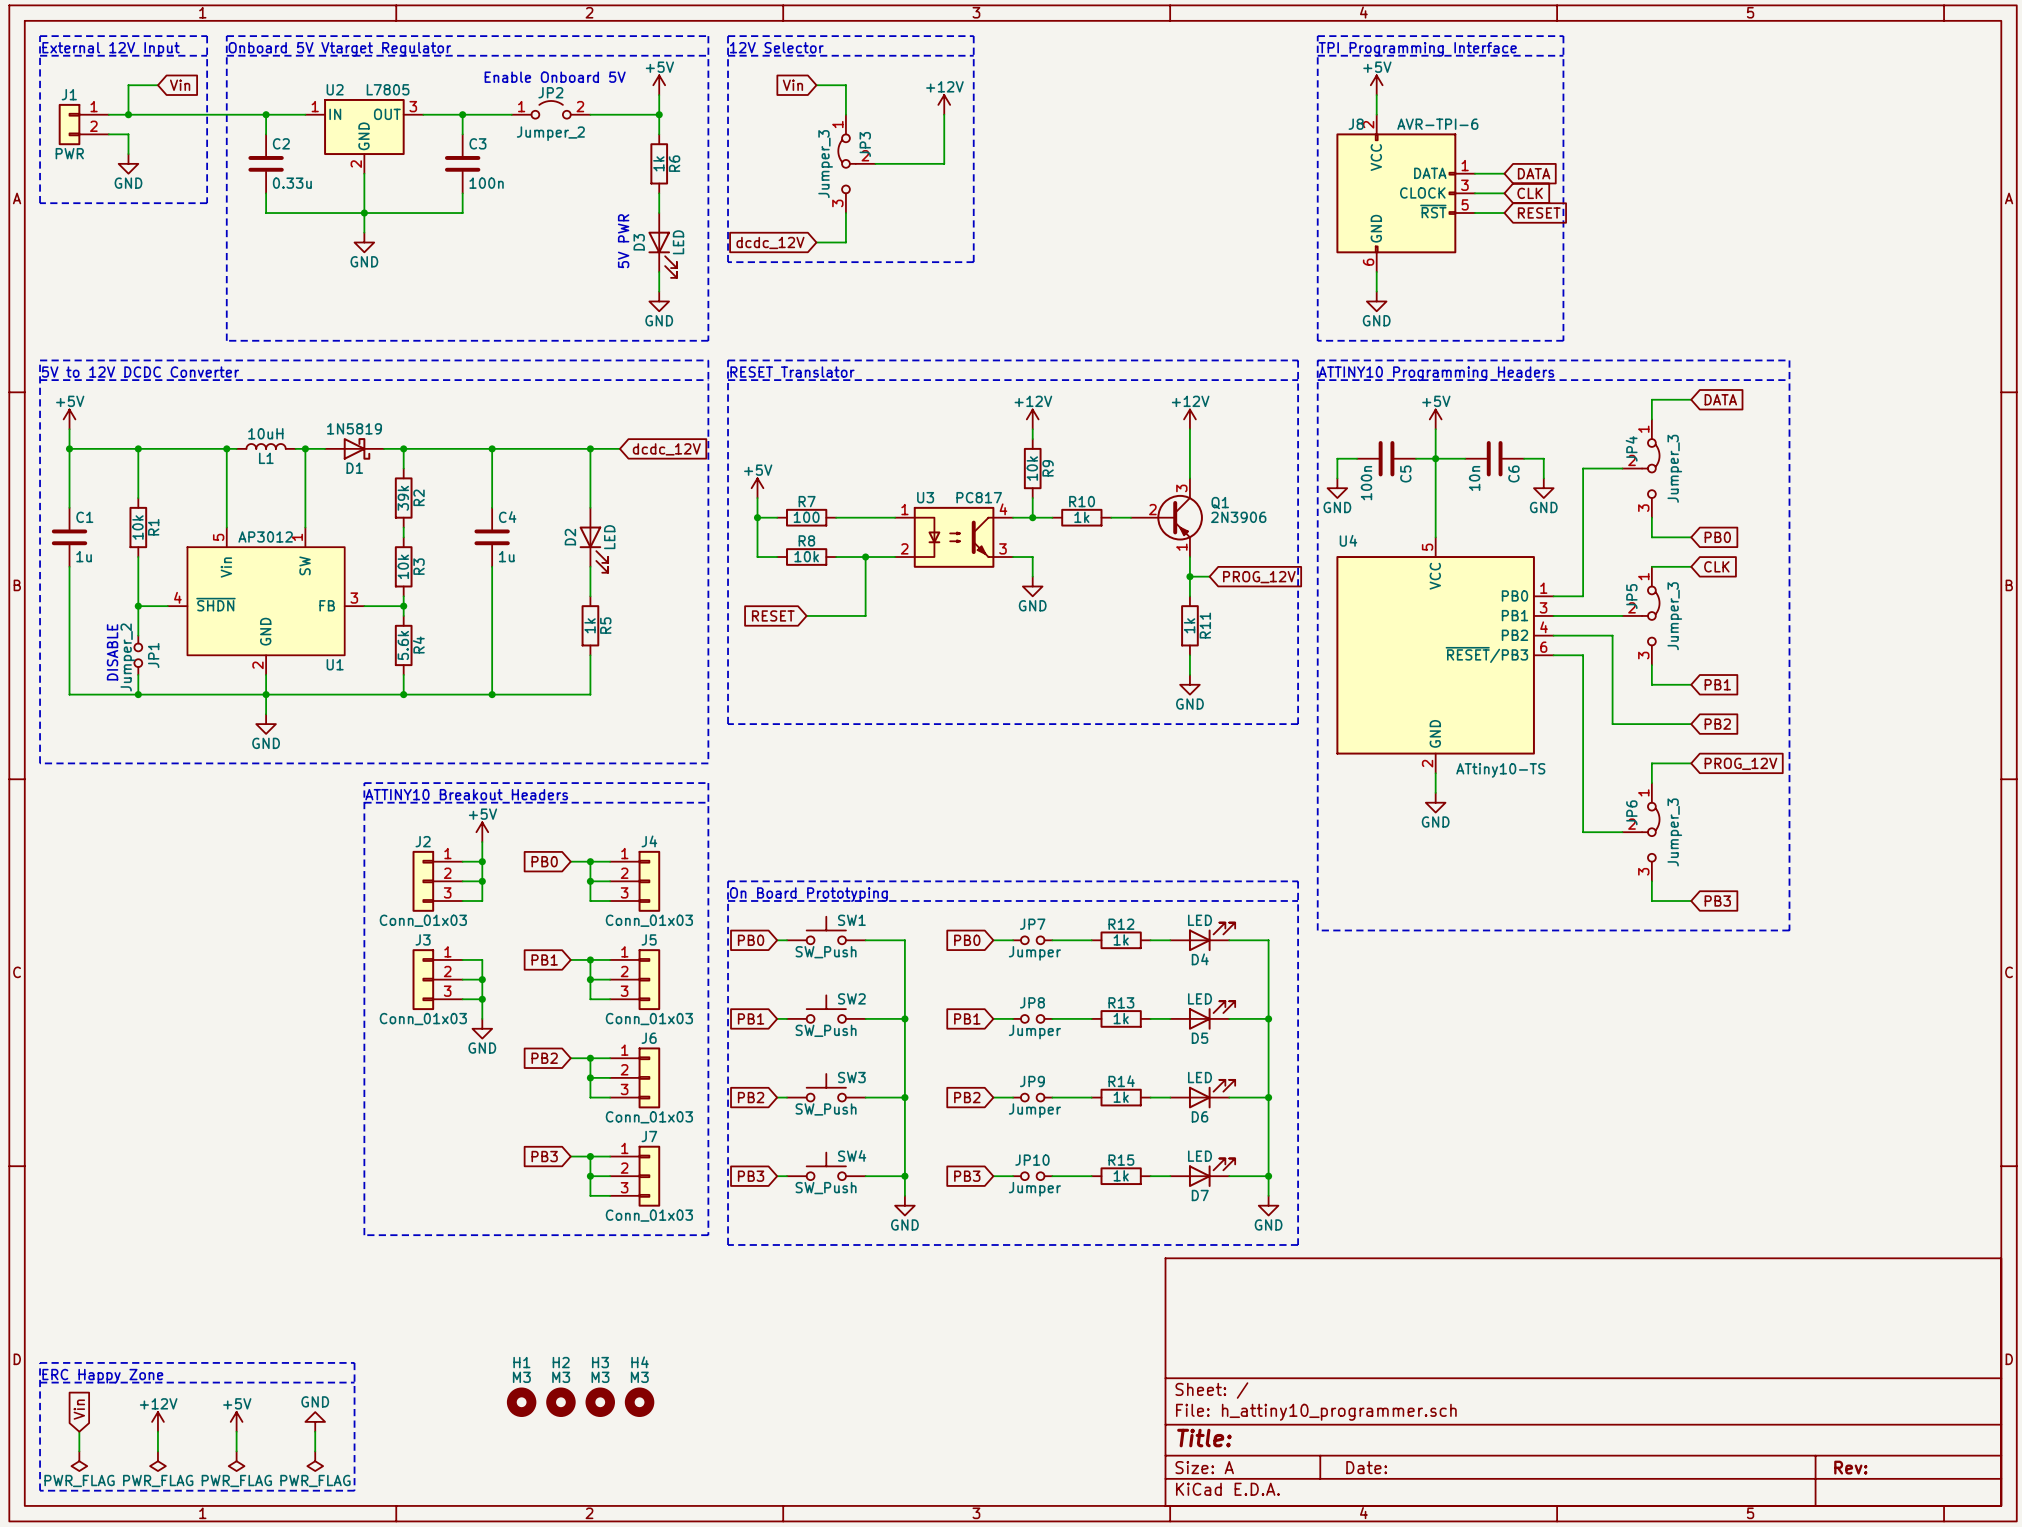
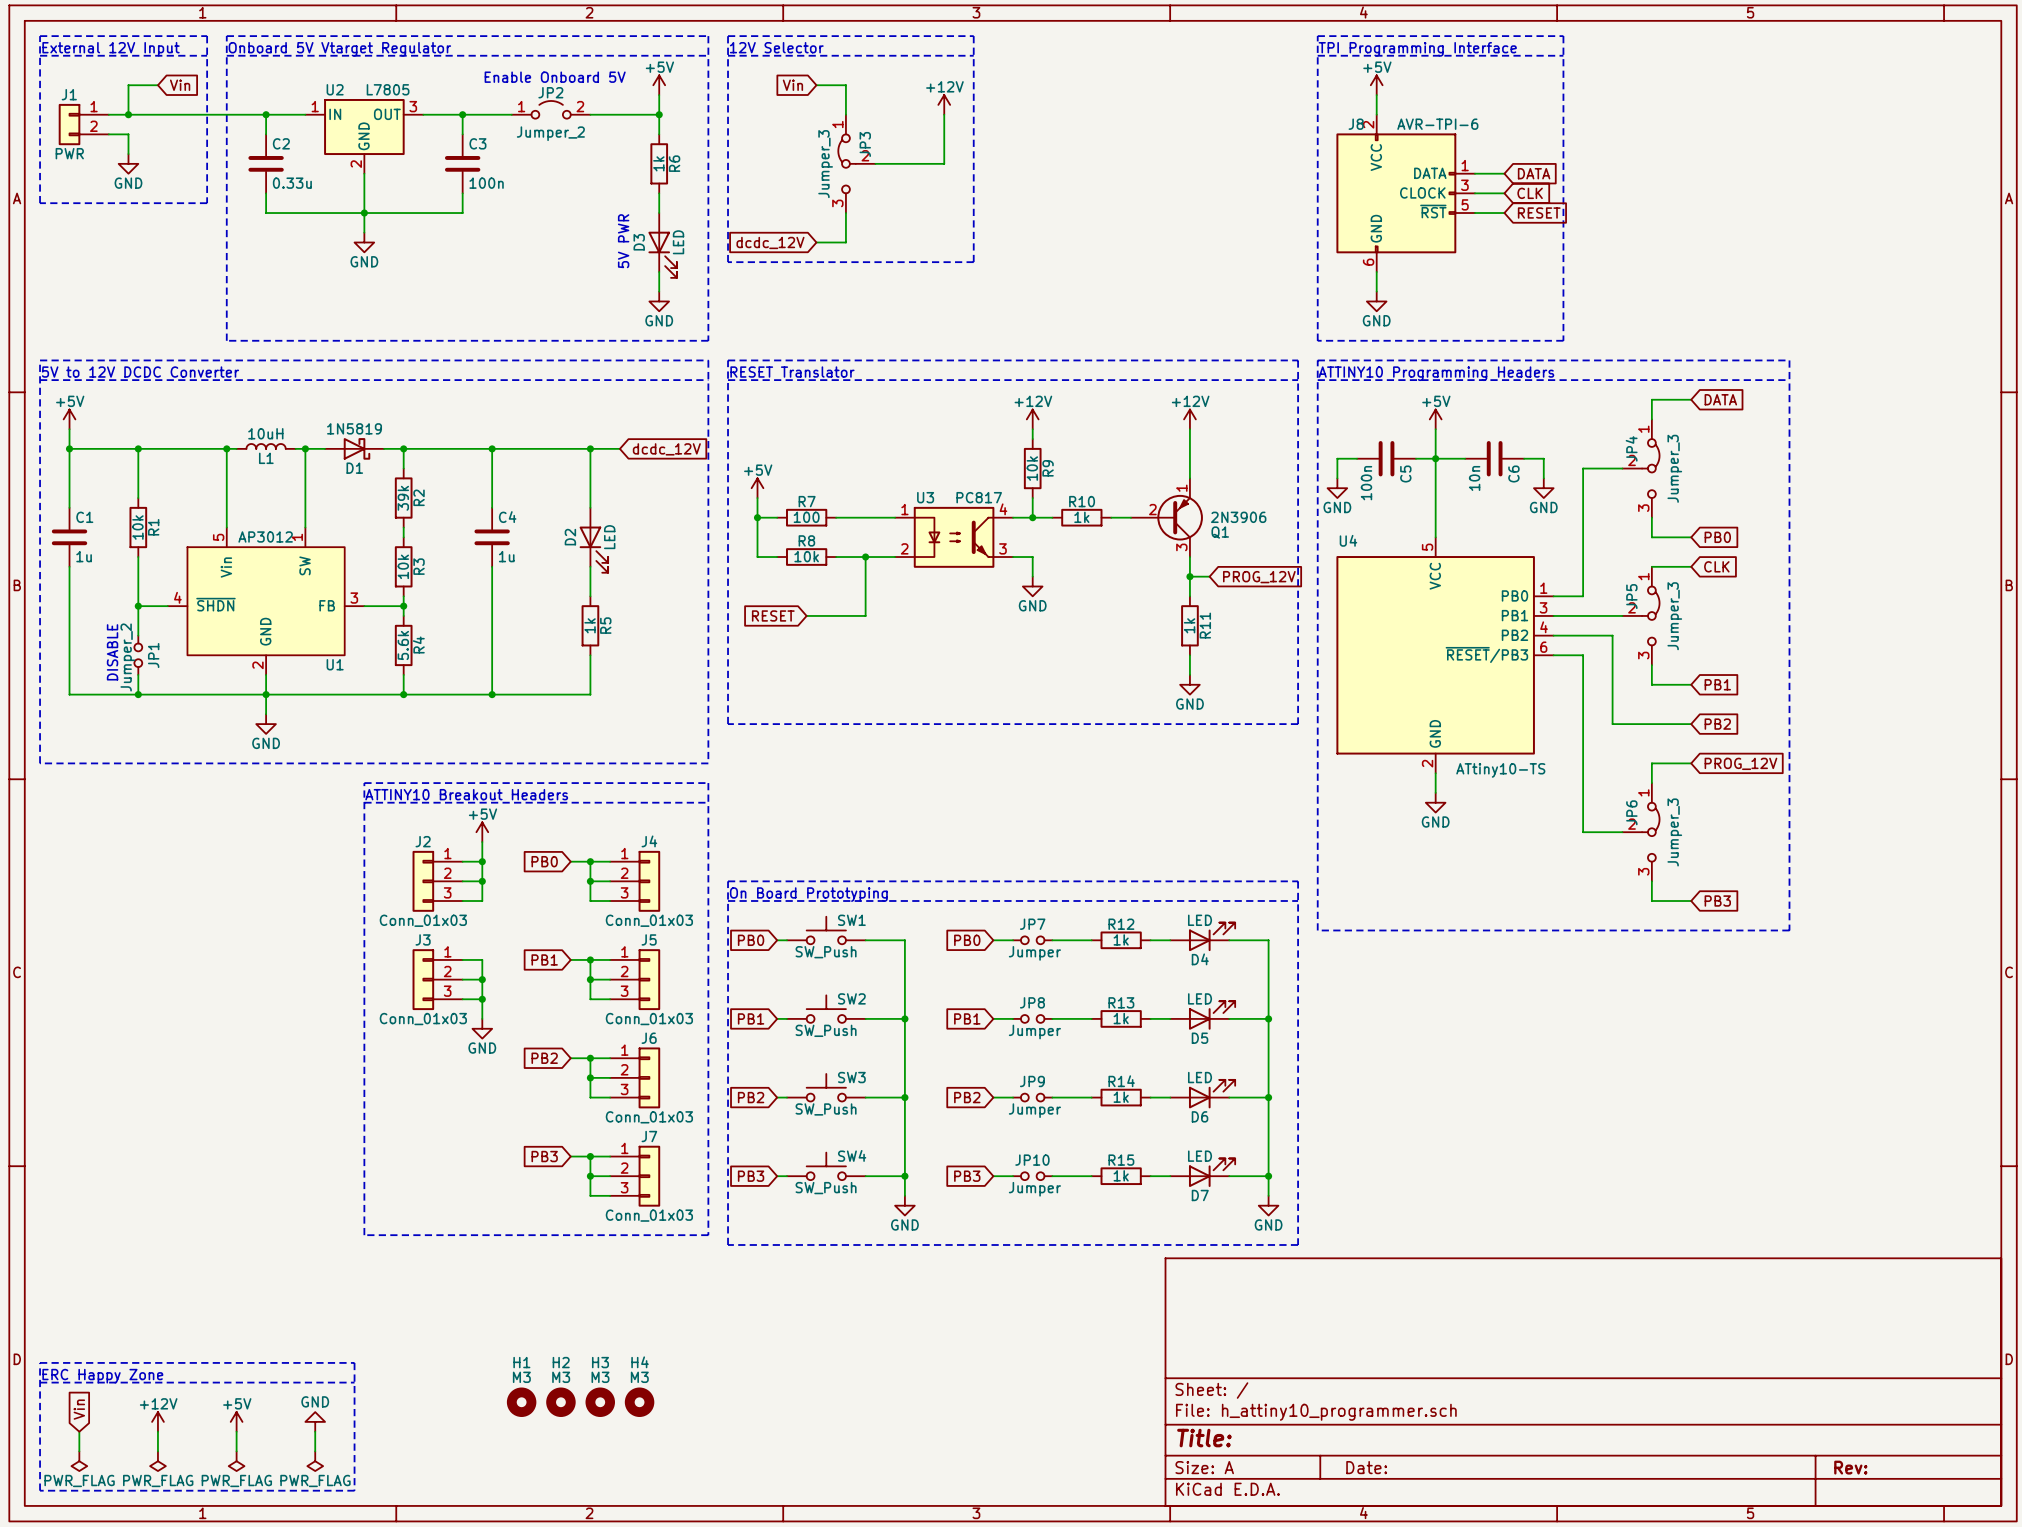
Q1 flip: as is (1180, 517) -> up-down (1180, 517)

